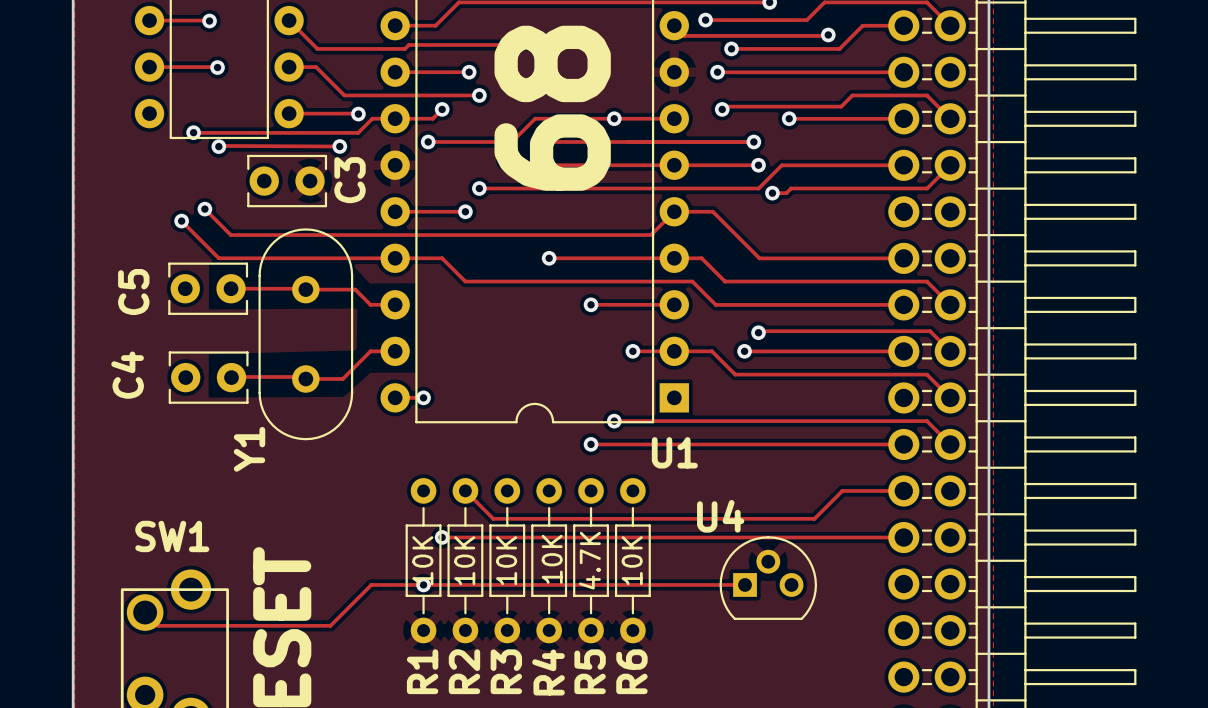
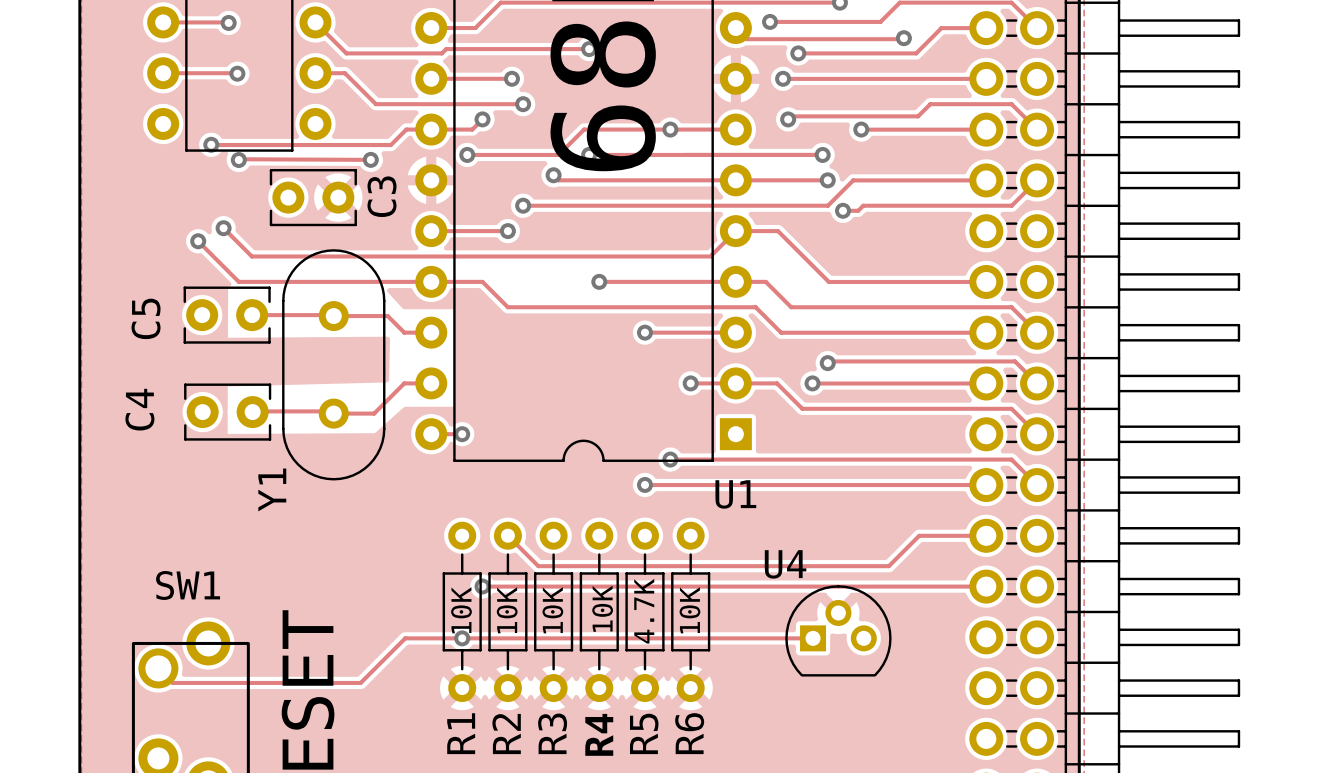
track: (289, 113) (358, 114) -> none
via: (358, 114) -> none

